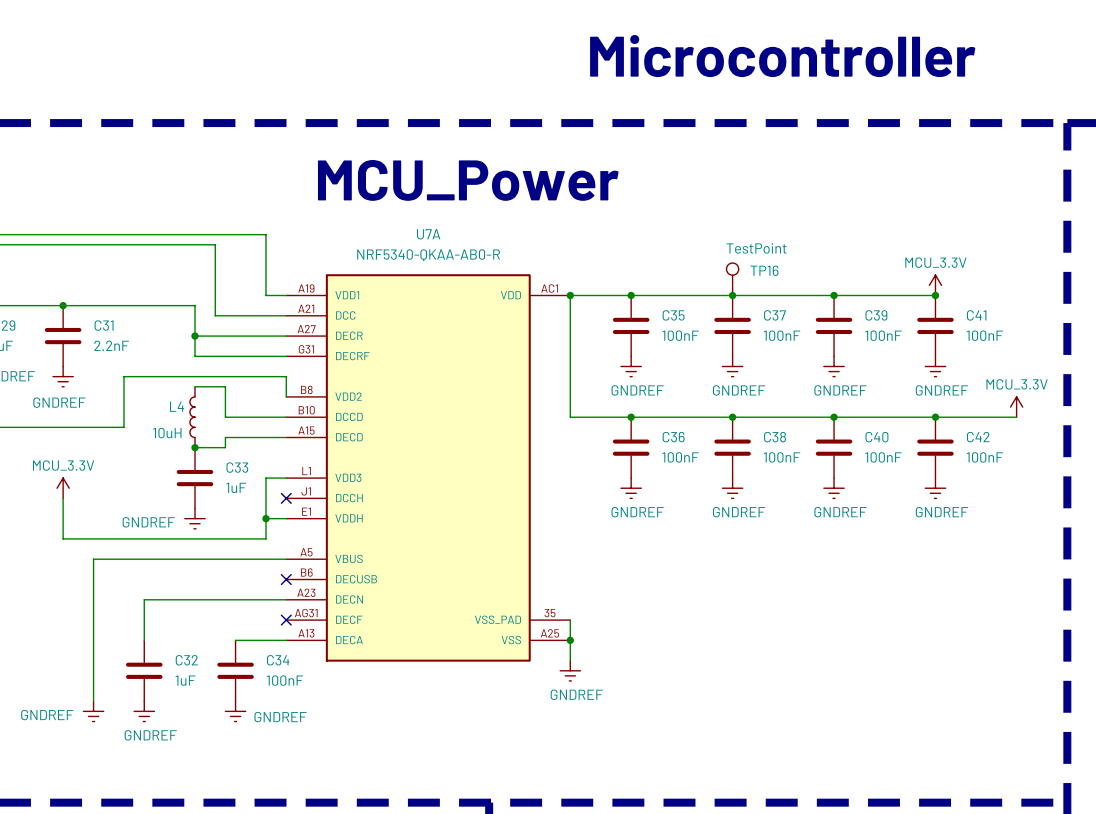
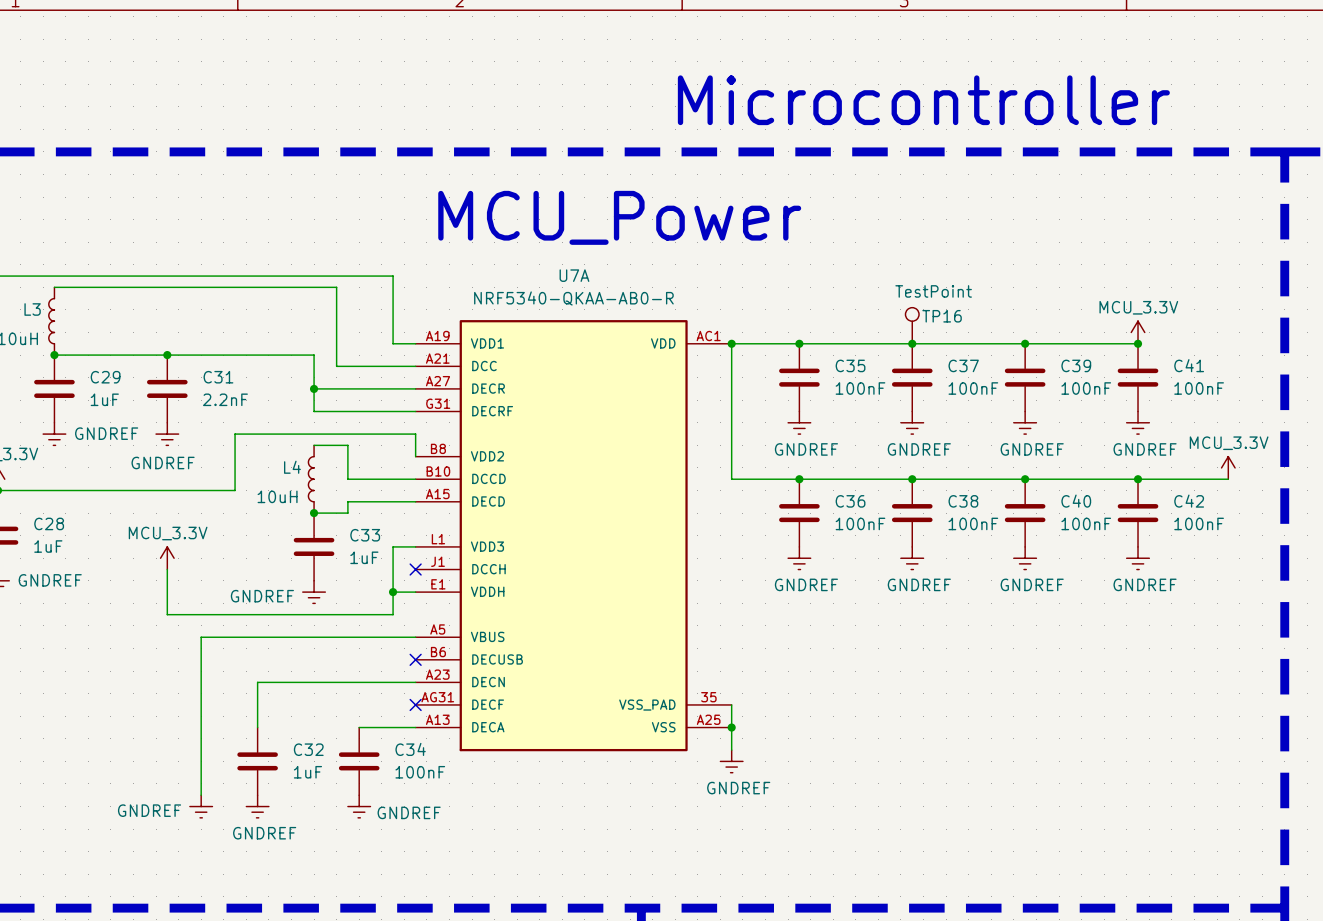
text position: Microcontroller (782, 56) -> Microcontroller (923, 100)

